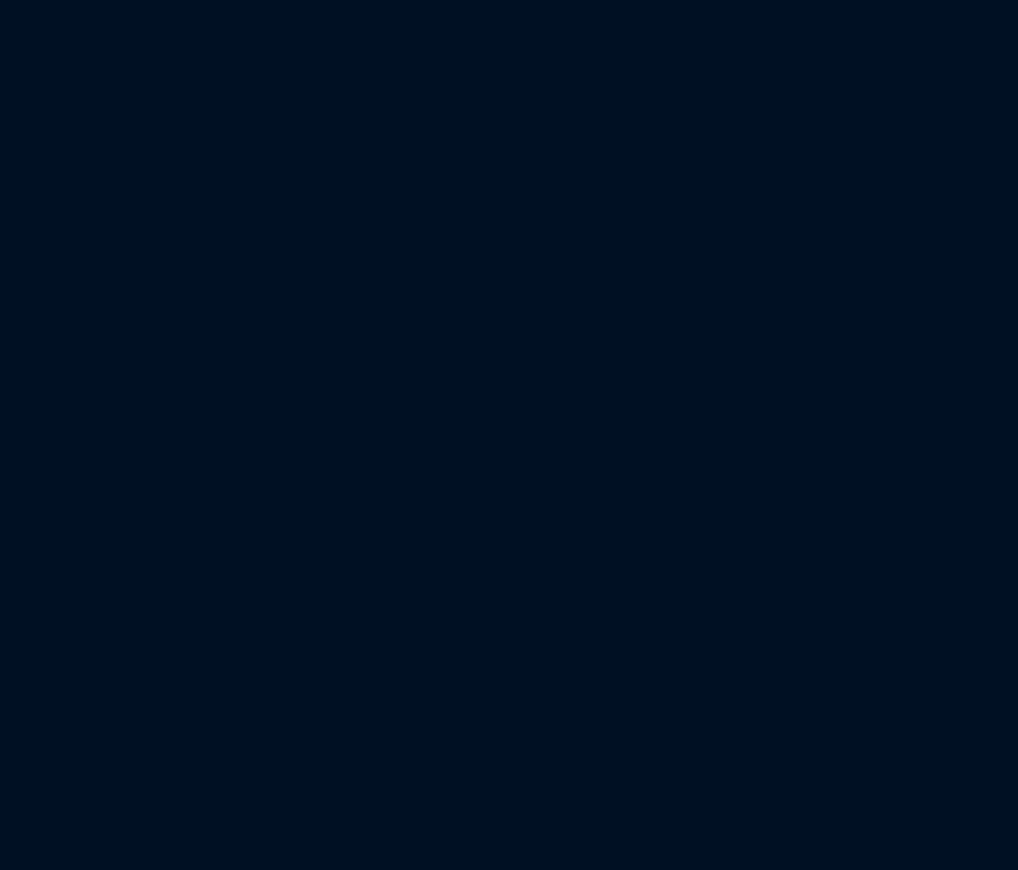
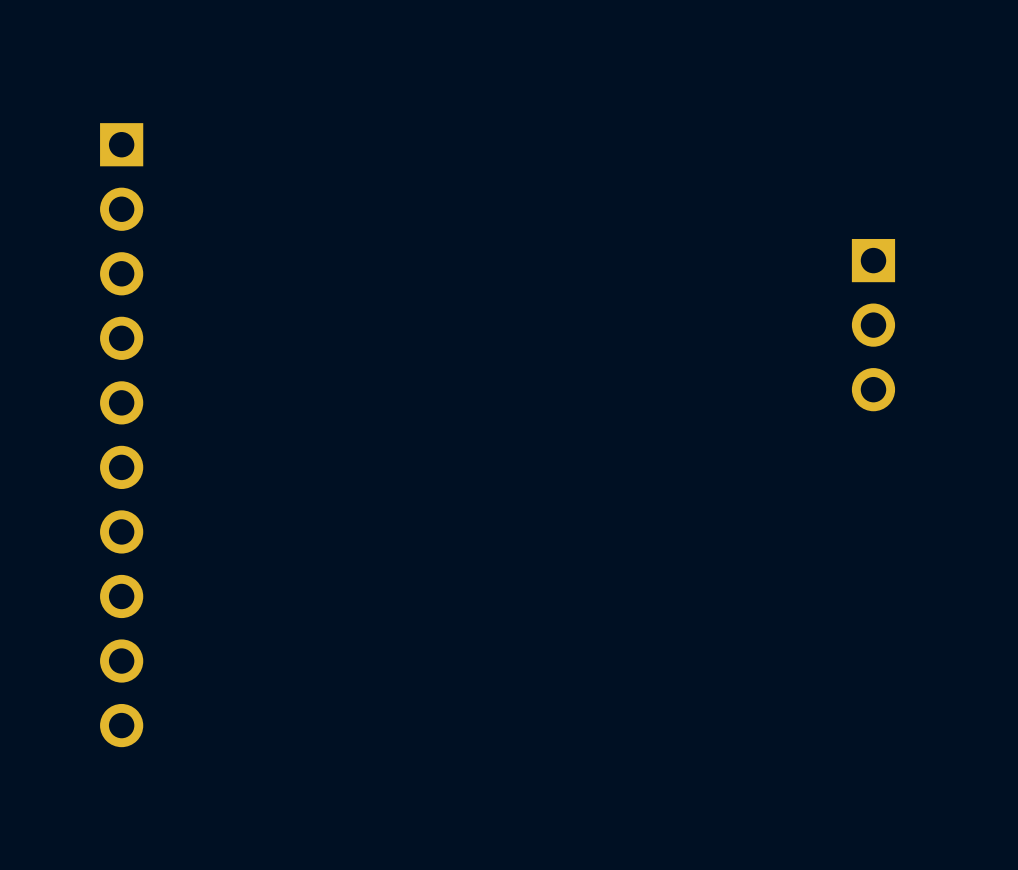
part: none -> (873, 325)
part: none -> (121, 435)

